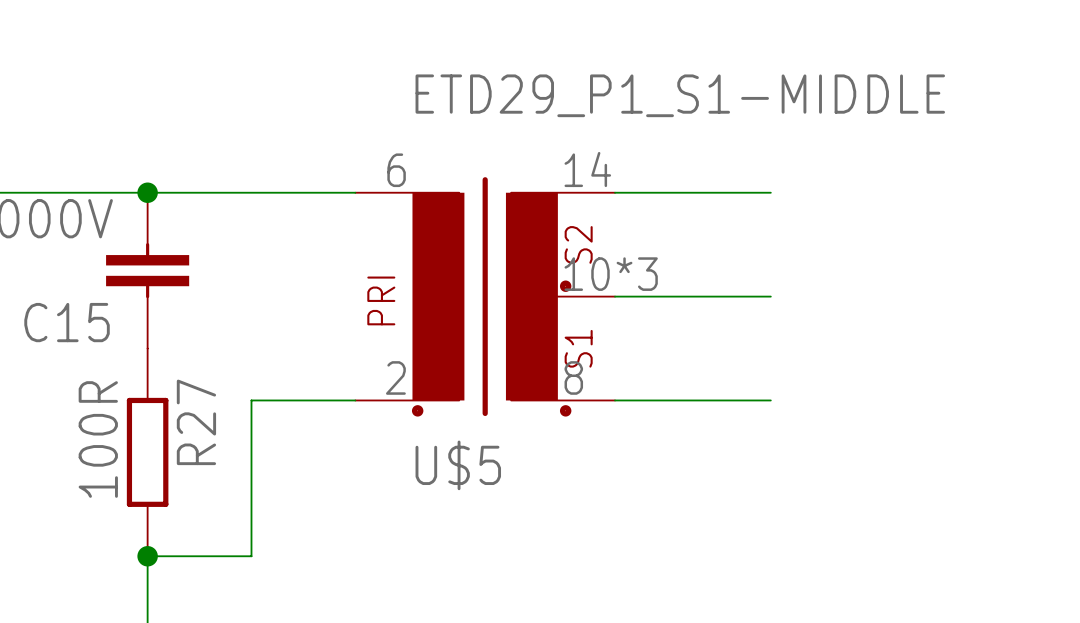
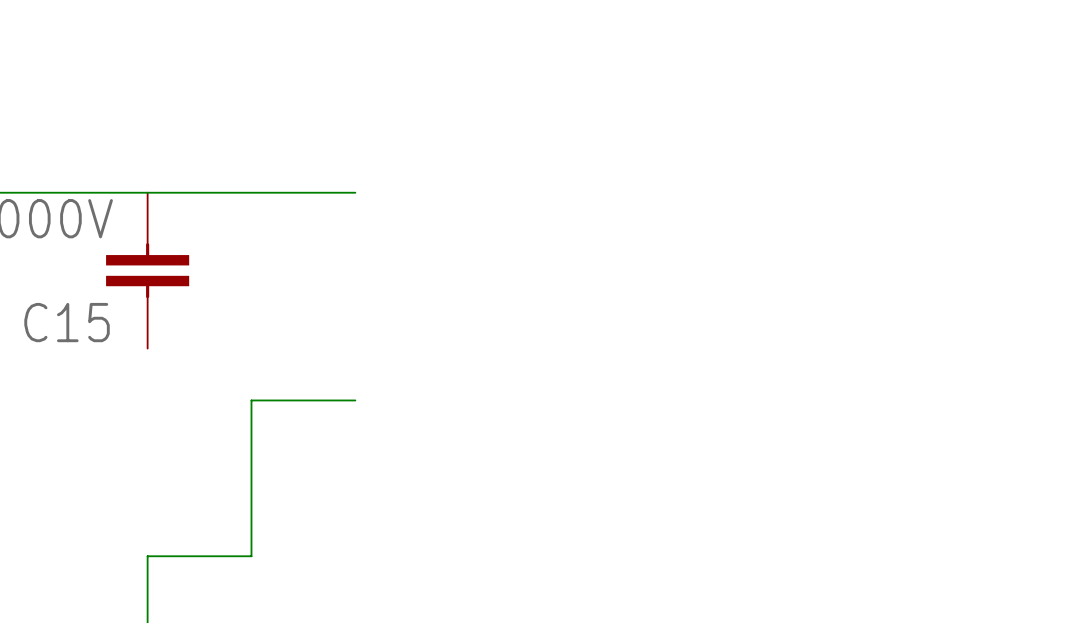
junction: (147, 192) -> none
wire: (615, 192) (770, 192) -> none
U$5: ETD29_P1_S1-MIDDLE (485, 296) -> none
wire: (615, 296) (770, 296) -> none
wire: (615, 400) (770, 400) -> none
R27: 100R (147, 452) -> none
junction: (147, 556) -> none

